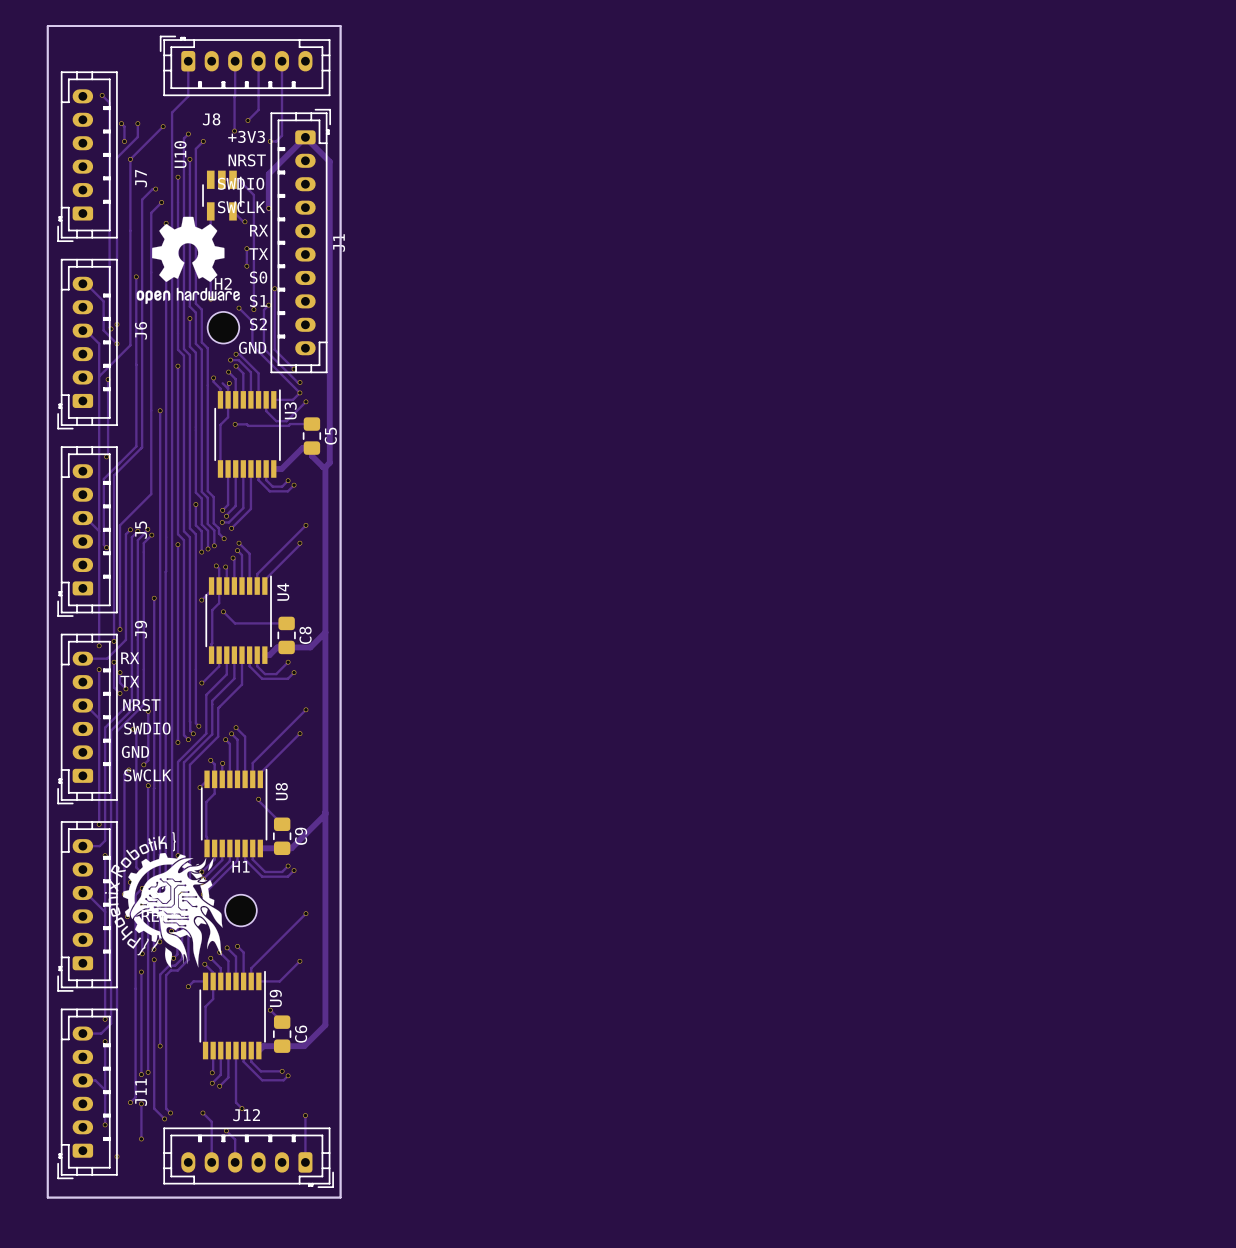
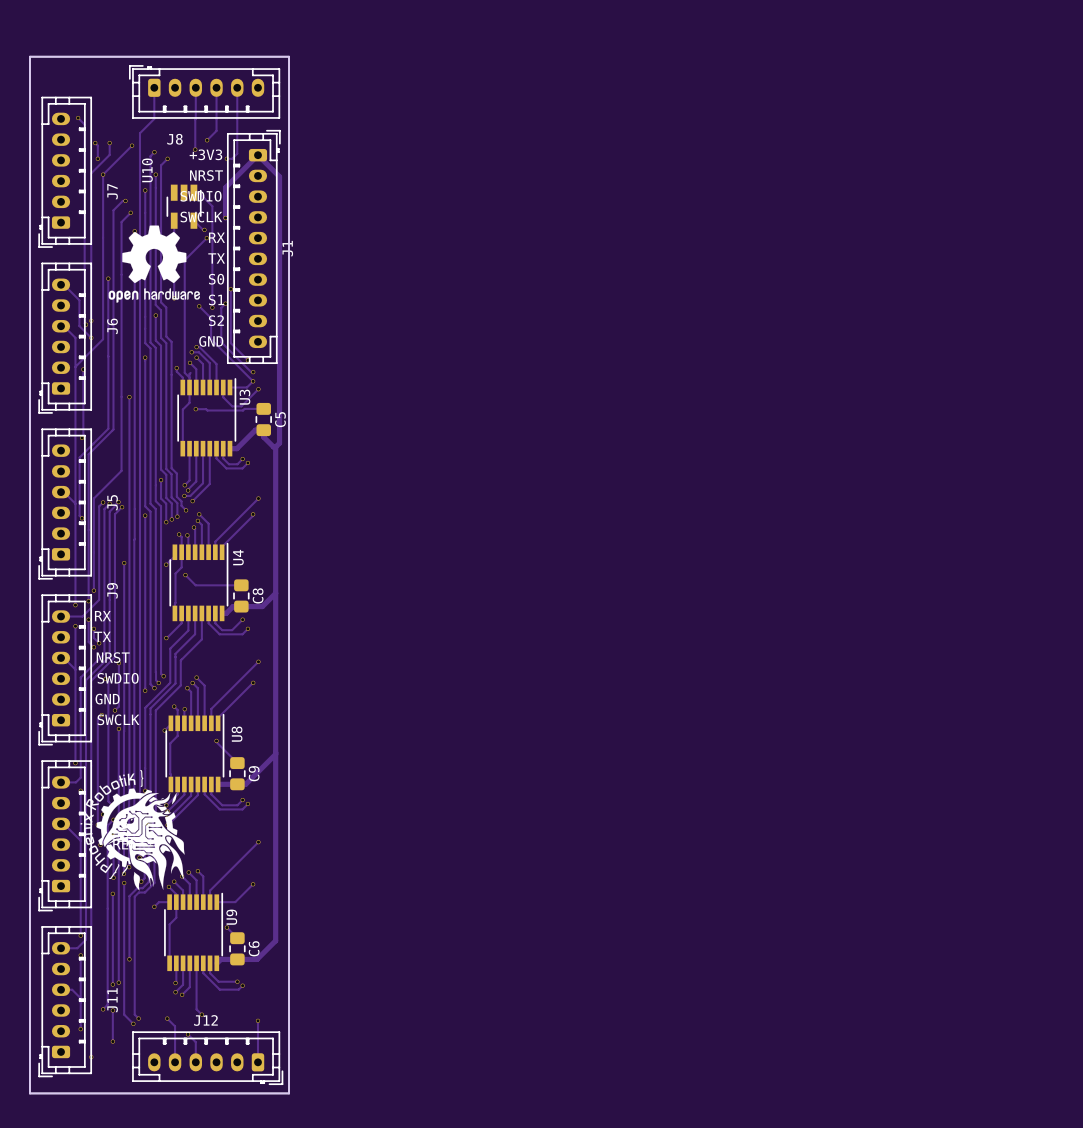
track: none -> (206, 238) (184, 260) (184, 372)
via: none -> (206, 238)
track: (246, 248) (246, 266) -> none
via: (246, 248) -> none
via: (246, 266) -> none
H2: (223, 327) -> none
via: (229, 383) -> none
H1: (241, 910) -> none

